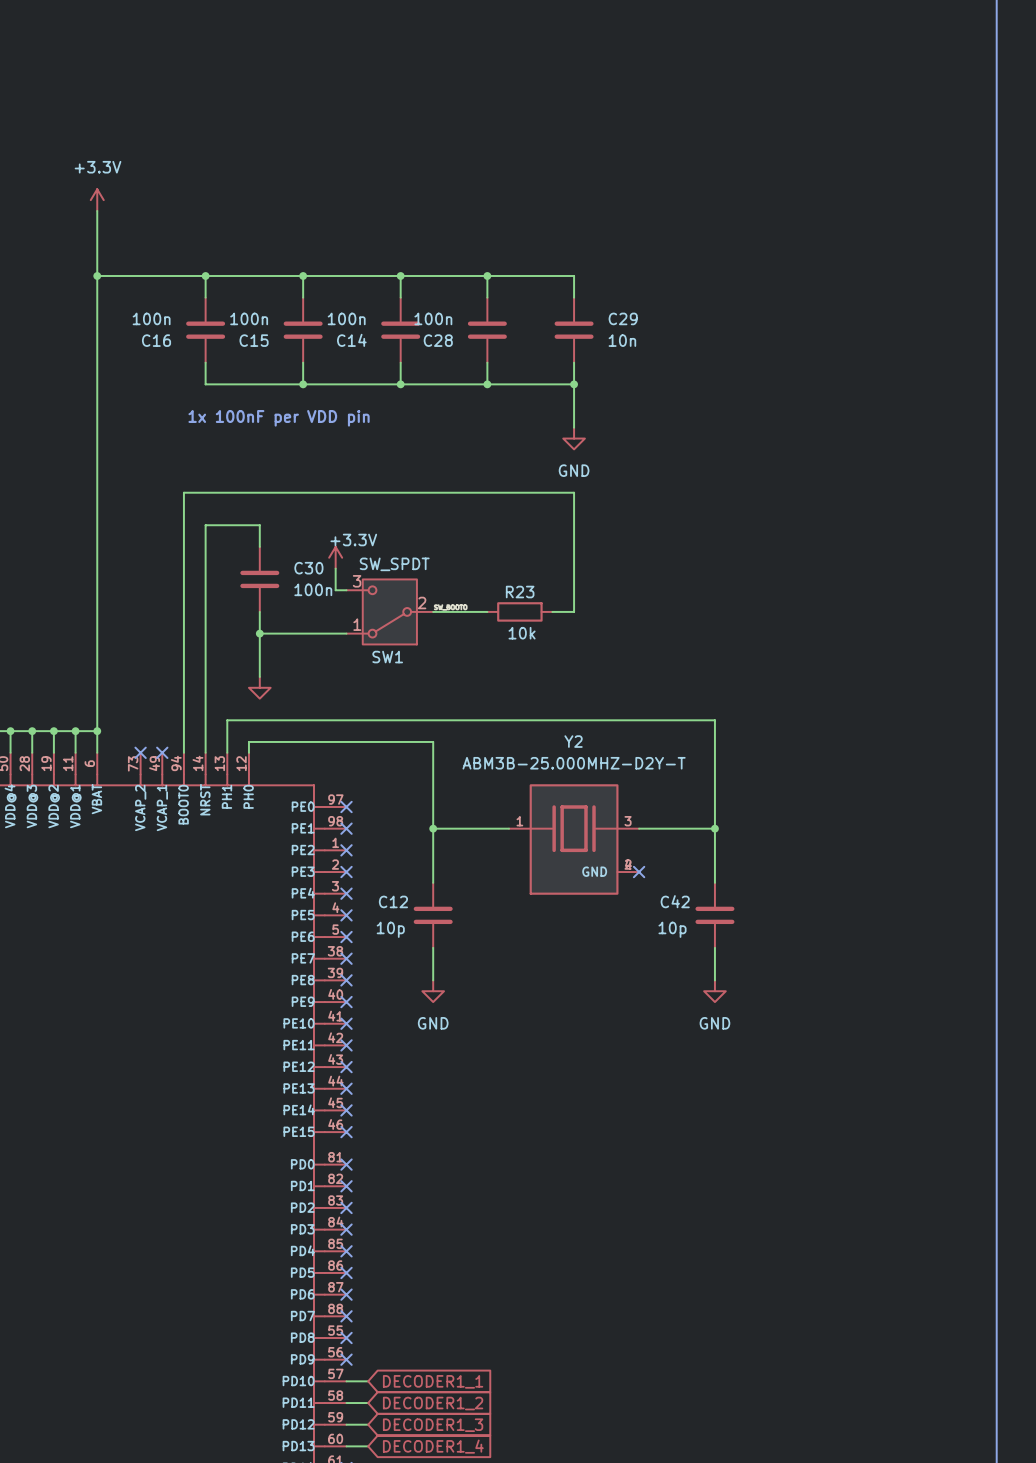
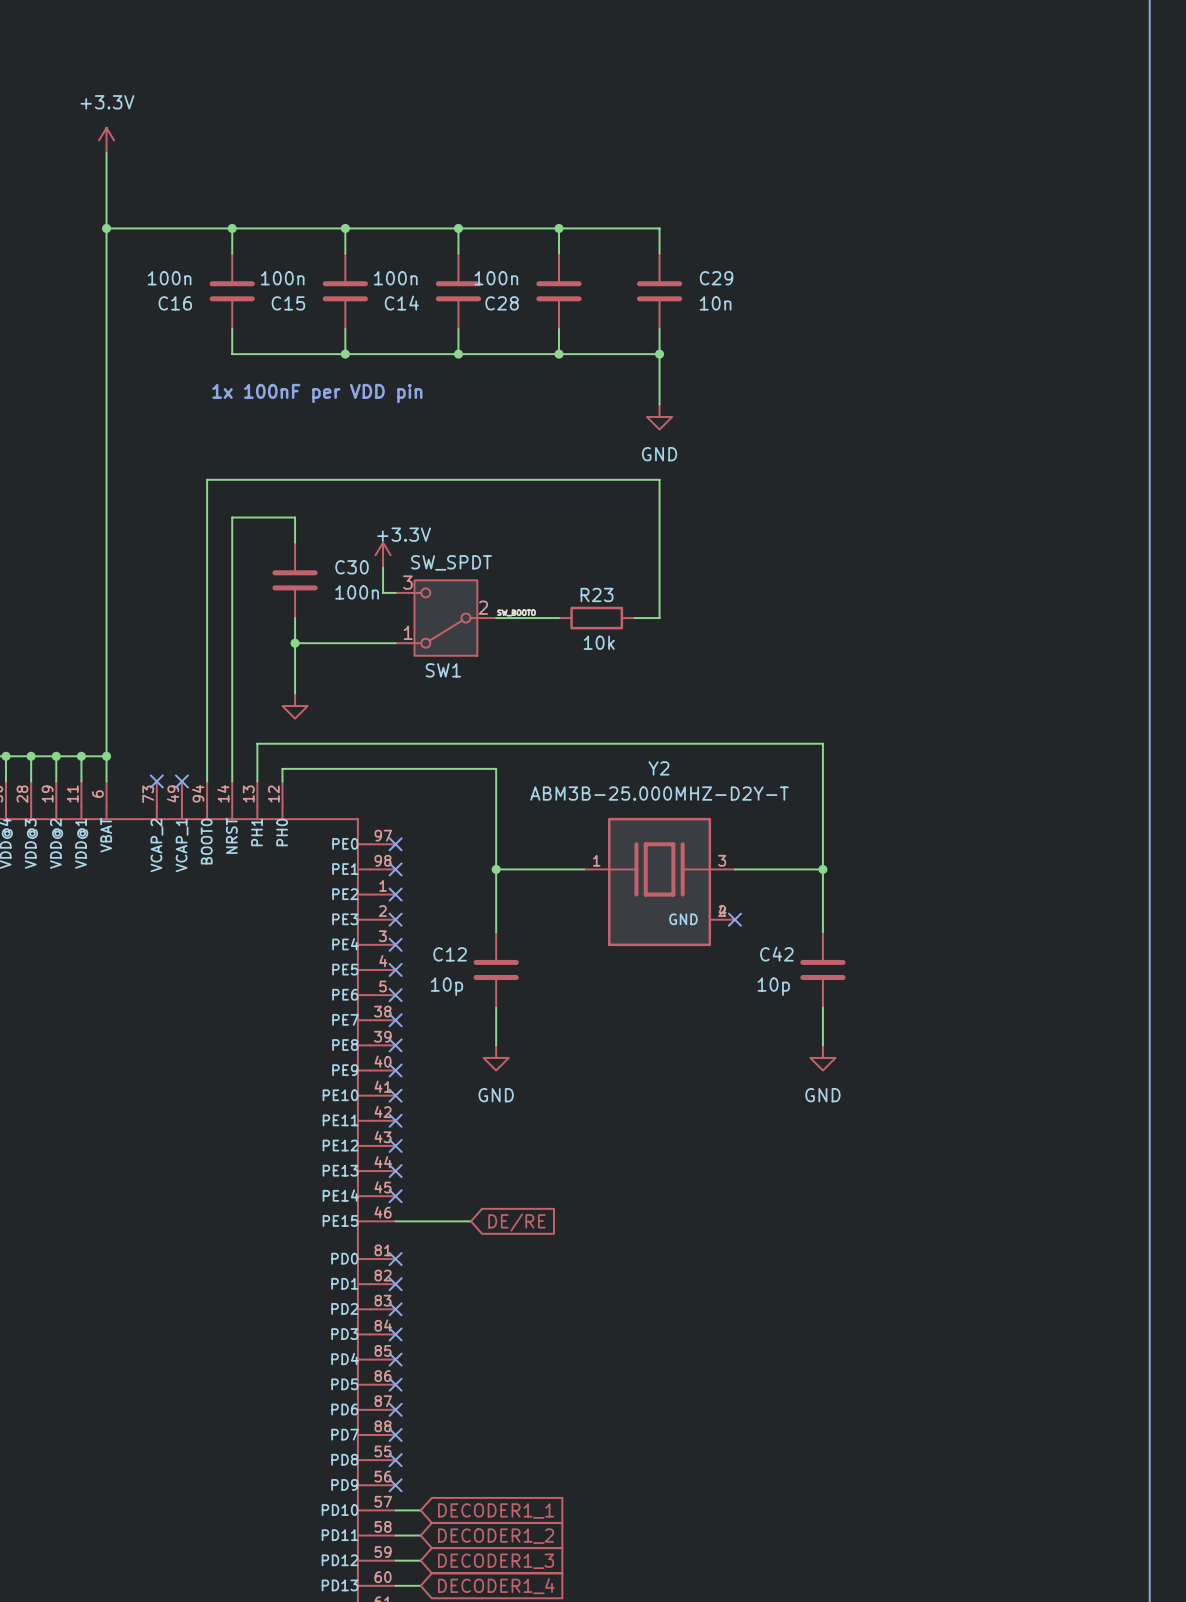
wire: none -> (395, 1221) (471, 1221)
no-connect mark: (346, 1132) -> none
global label: none -> DE/RE (516, 1222)

